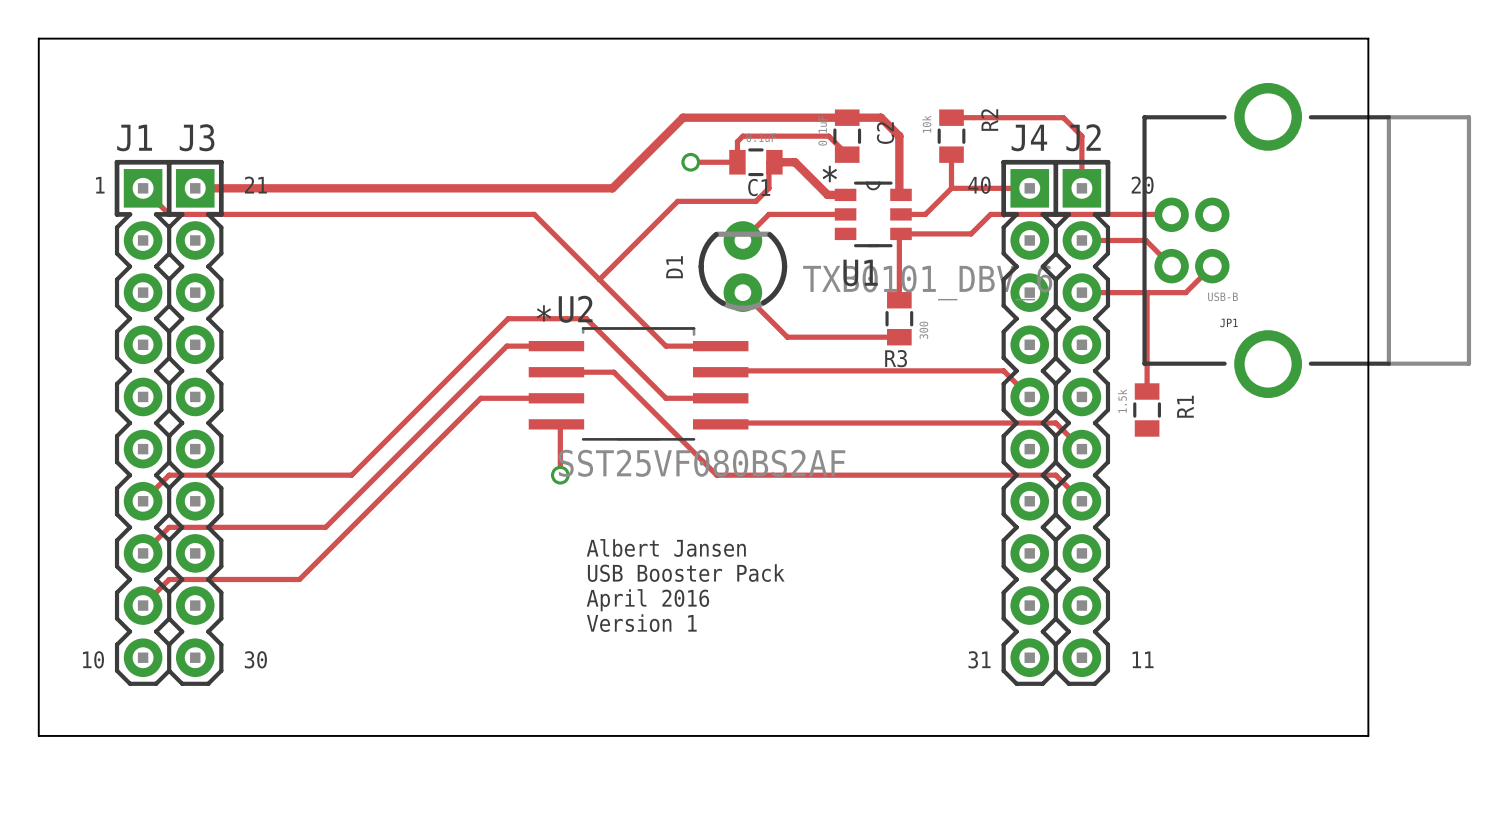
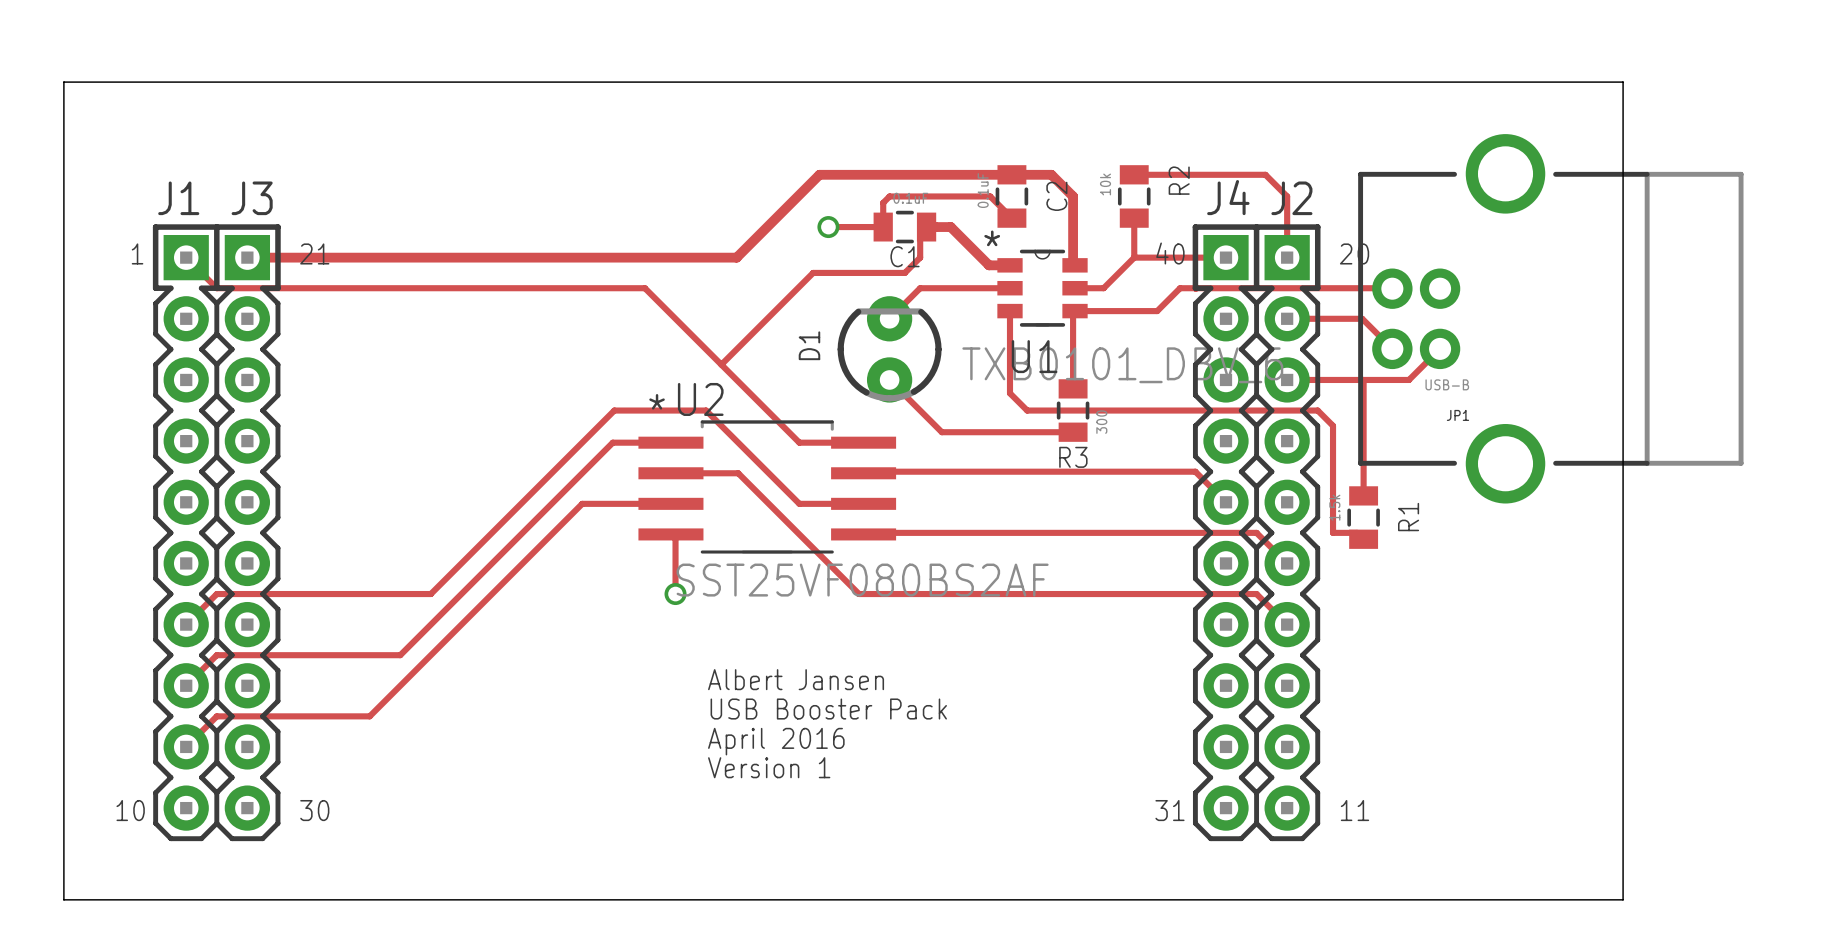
top track: none -> (1010, 311) (1010, 393) (1027, 410) (1317, 410) (1333, 425) (1333, 532) (1357, 532) (1363, 539)

